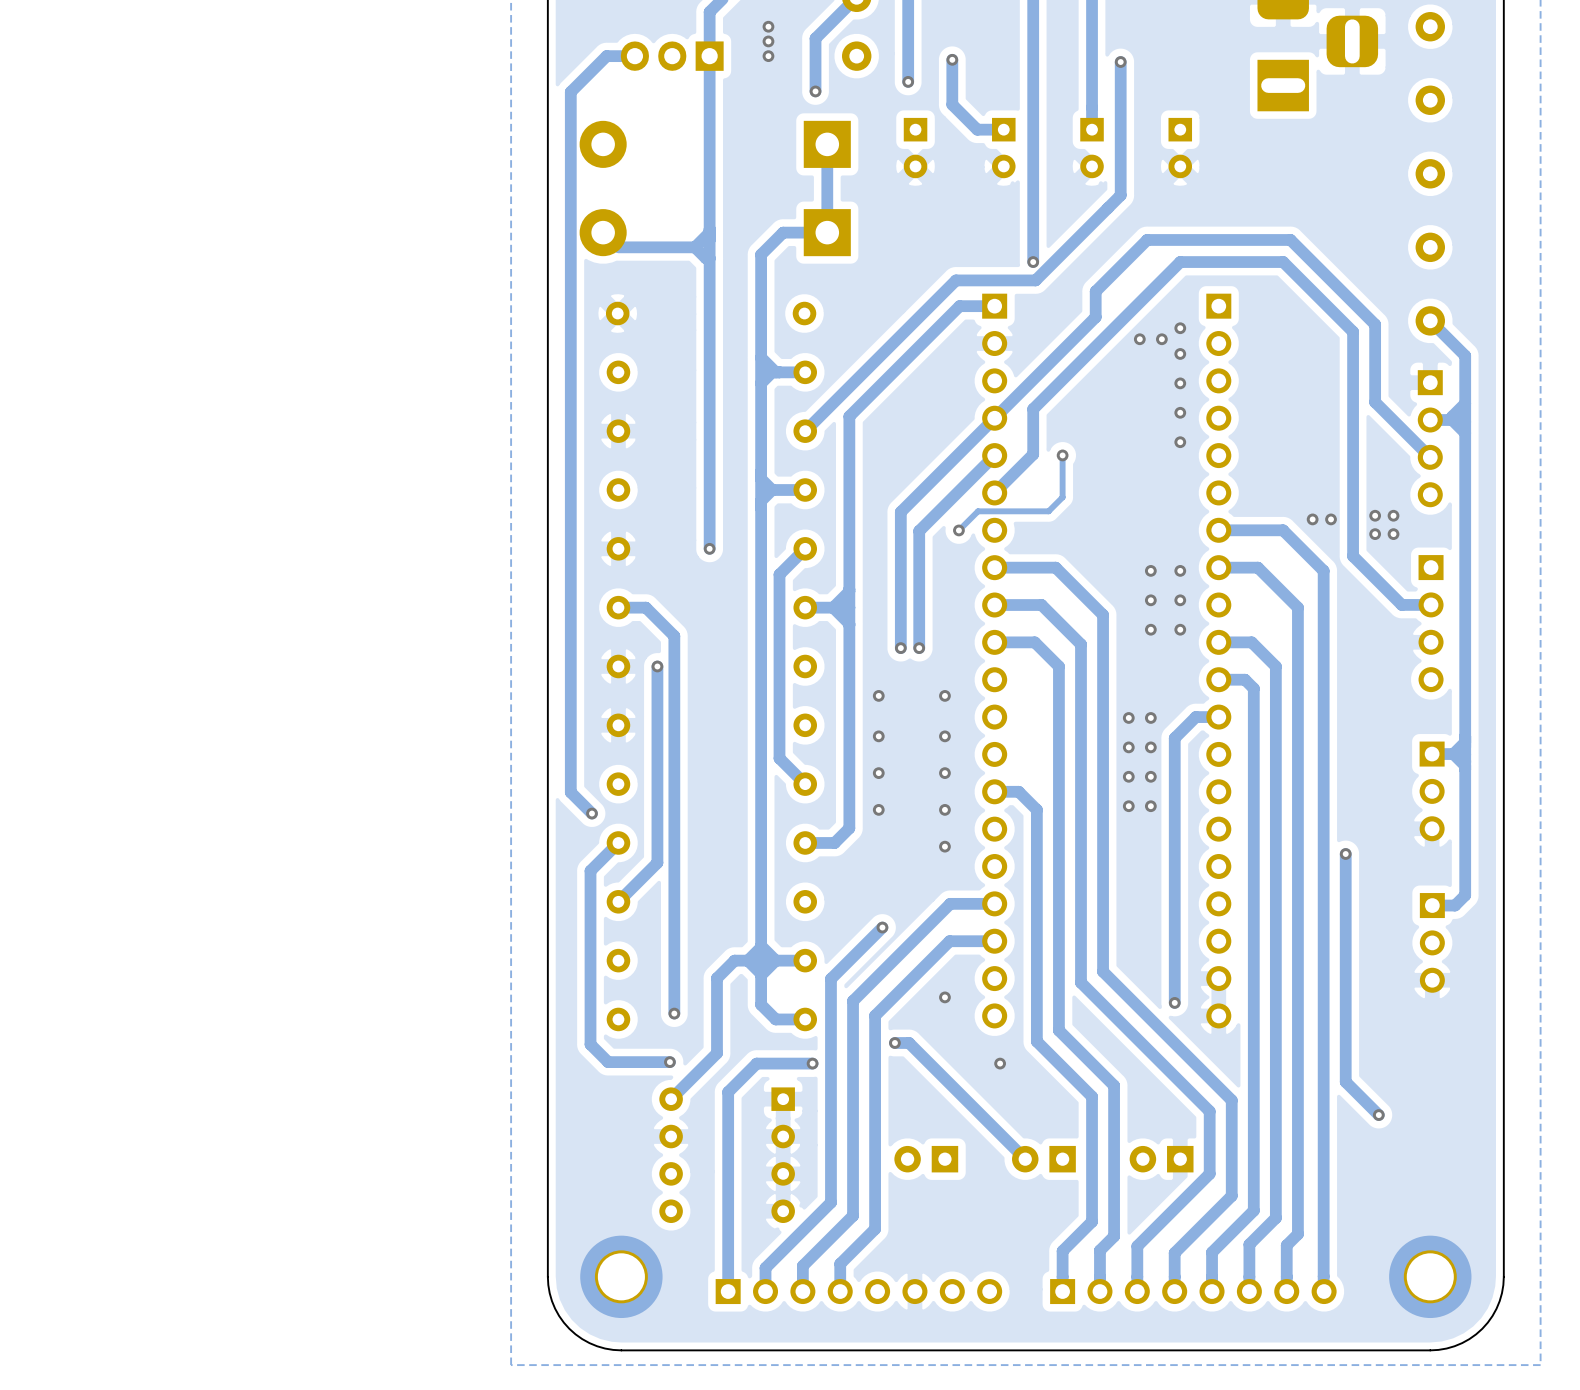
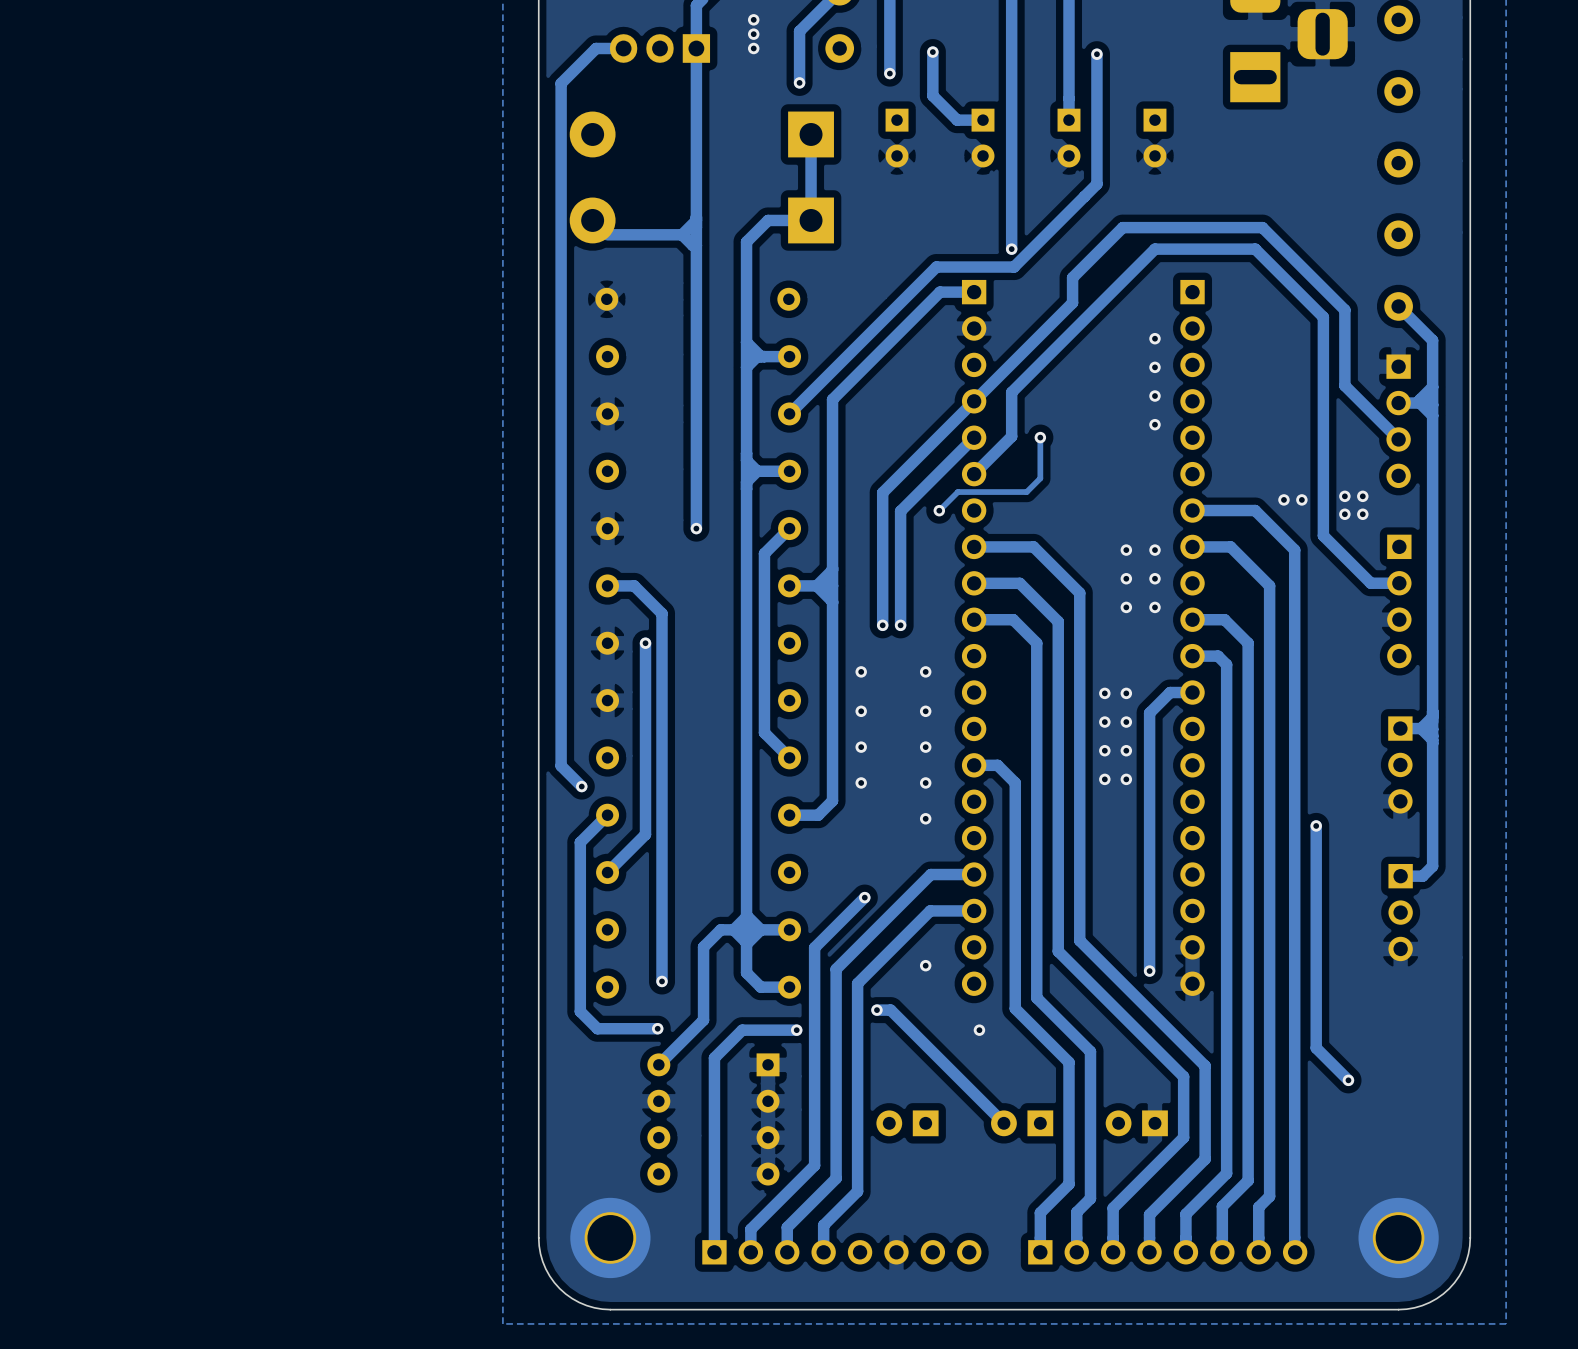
via: (1180, 328) -> none
via: (1139, 339) -> none
via: (1161, 339) -> none

